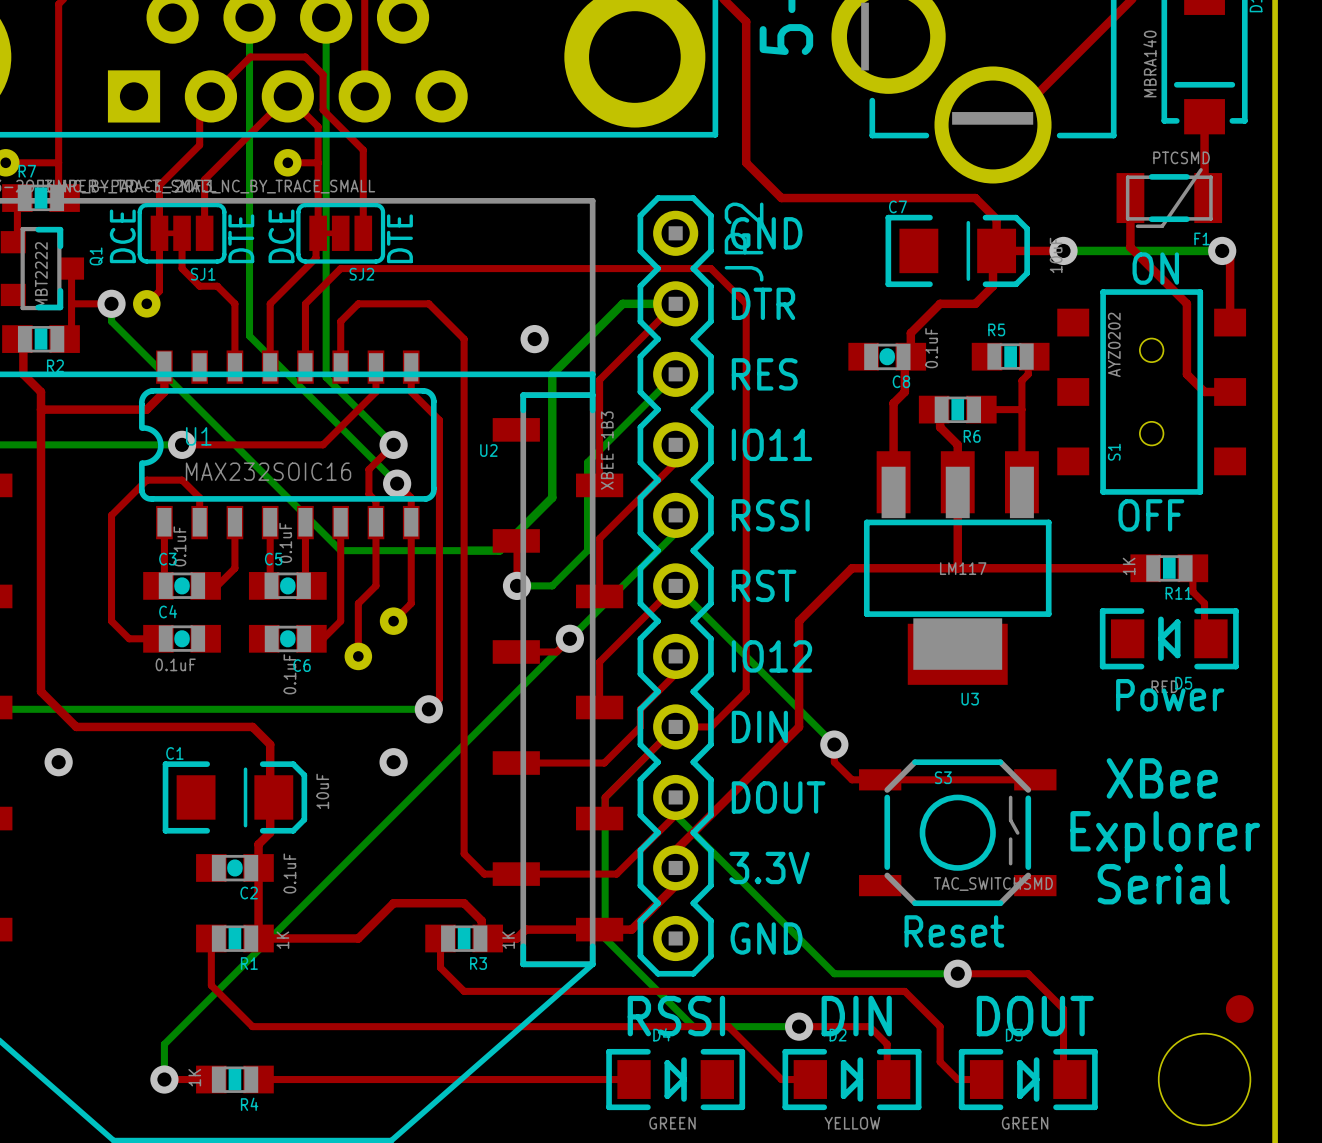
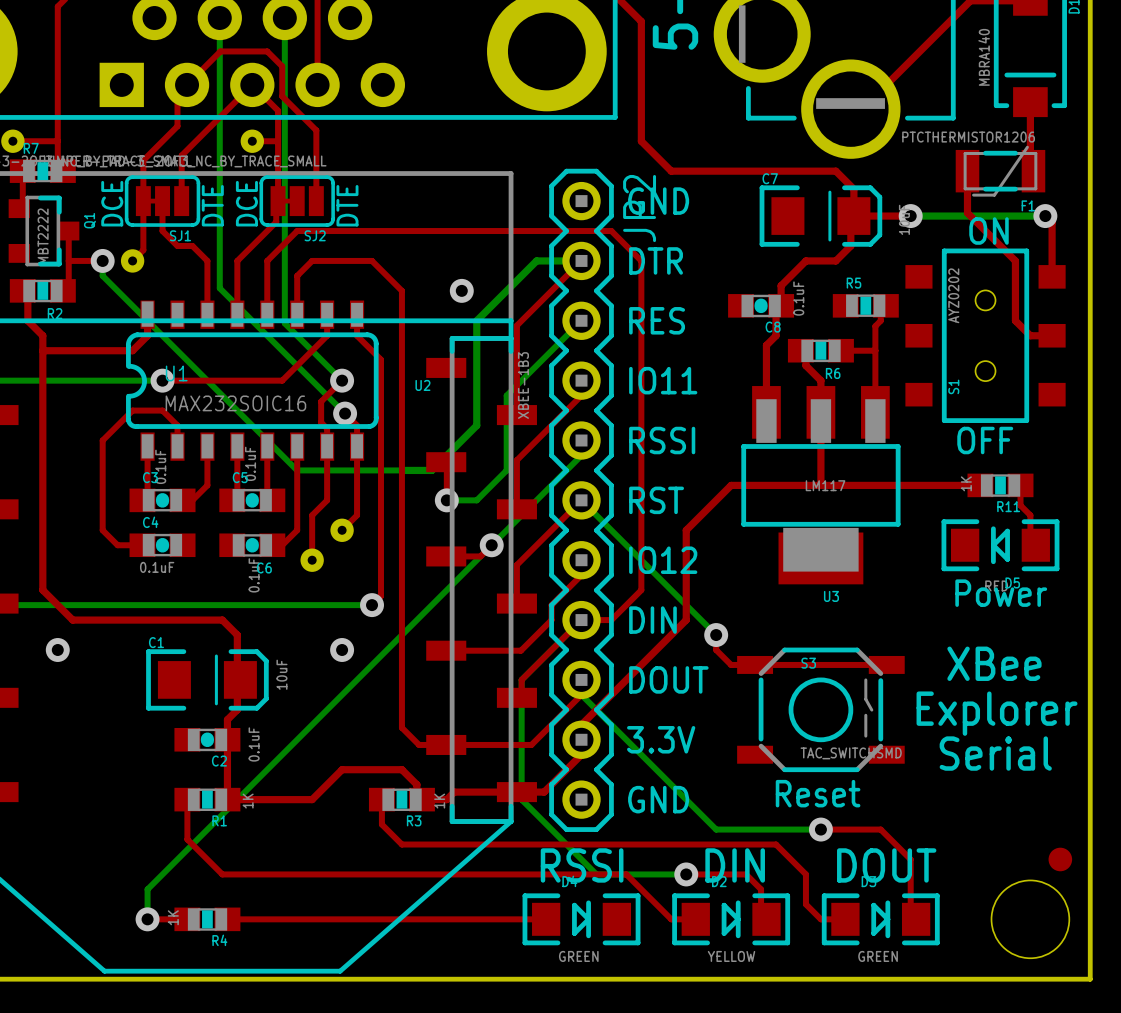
F1 value: PTCSMD (1181, 157) -> PTCTHERMISTOR1206 (968, 137)

